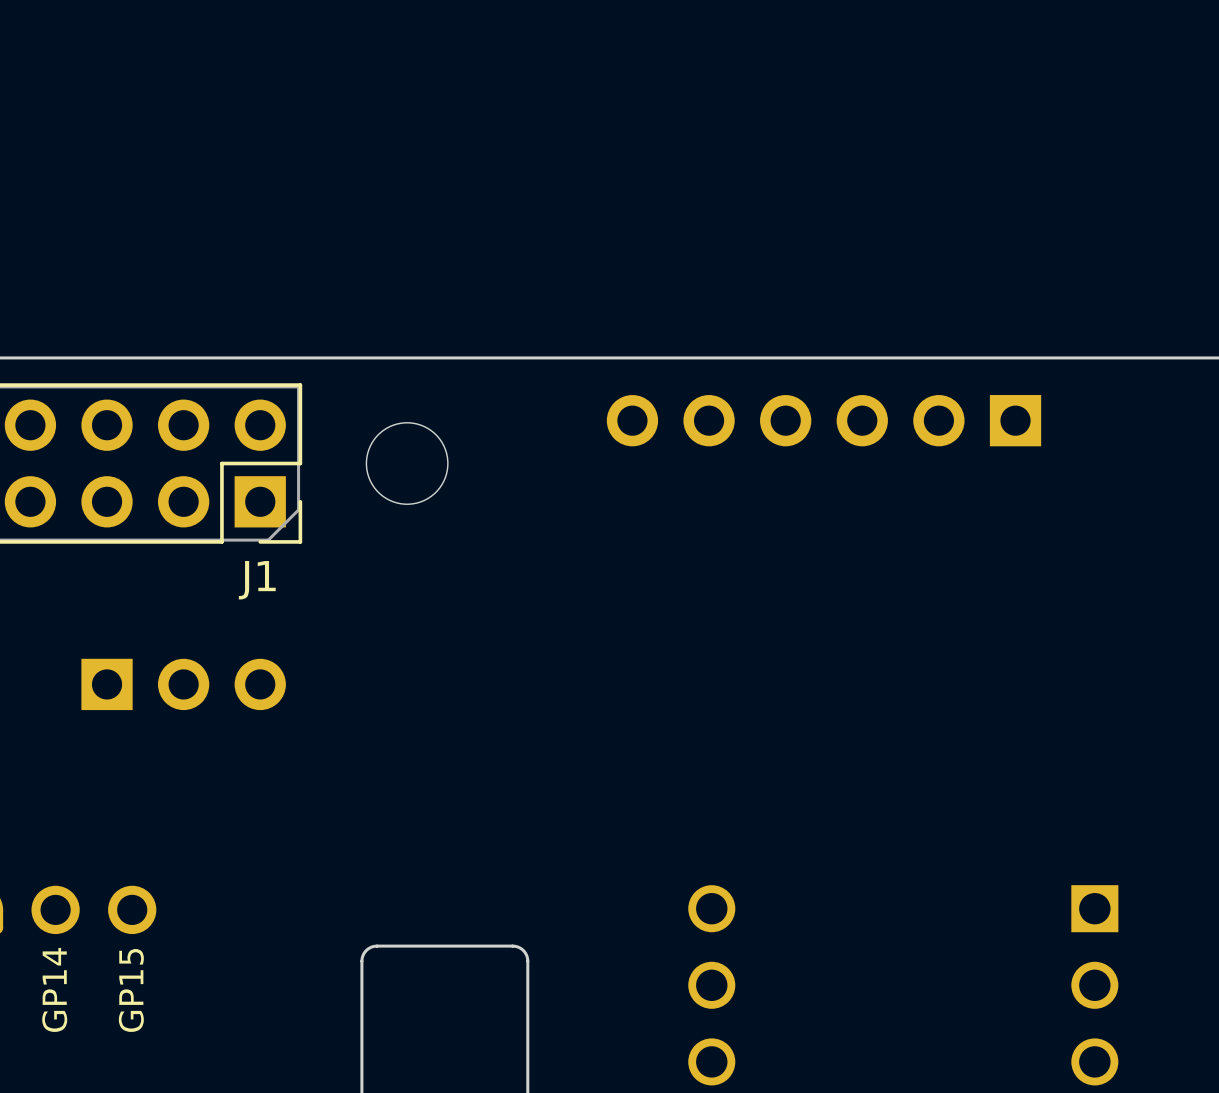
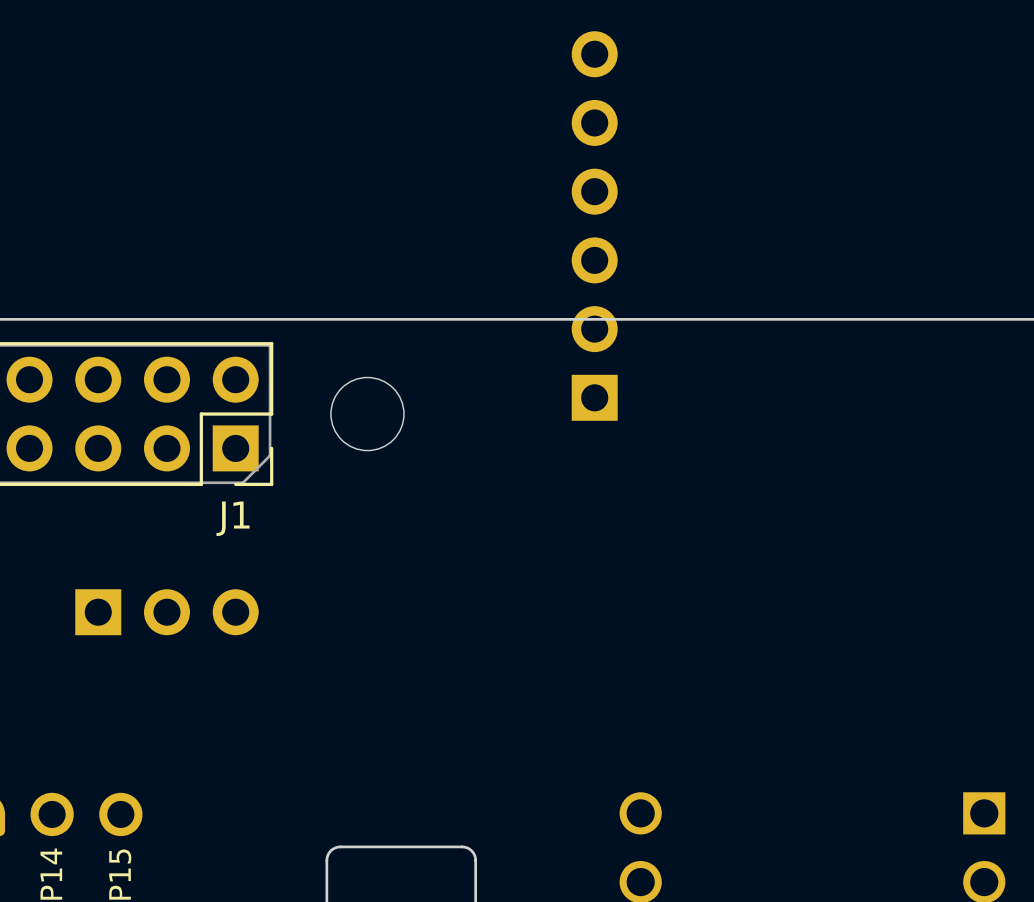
part rotation: 0° (823, 420) -> 90° clockwise (594, 226)

